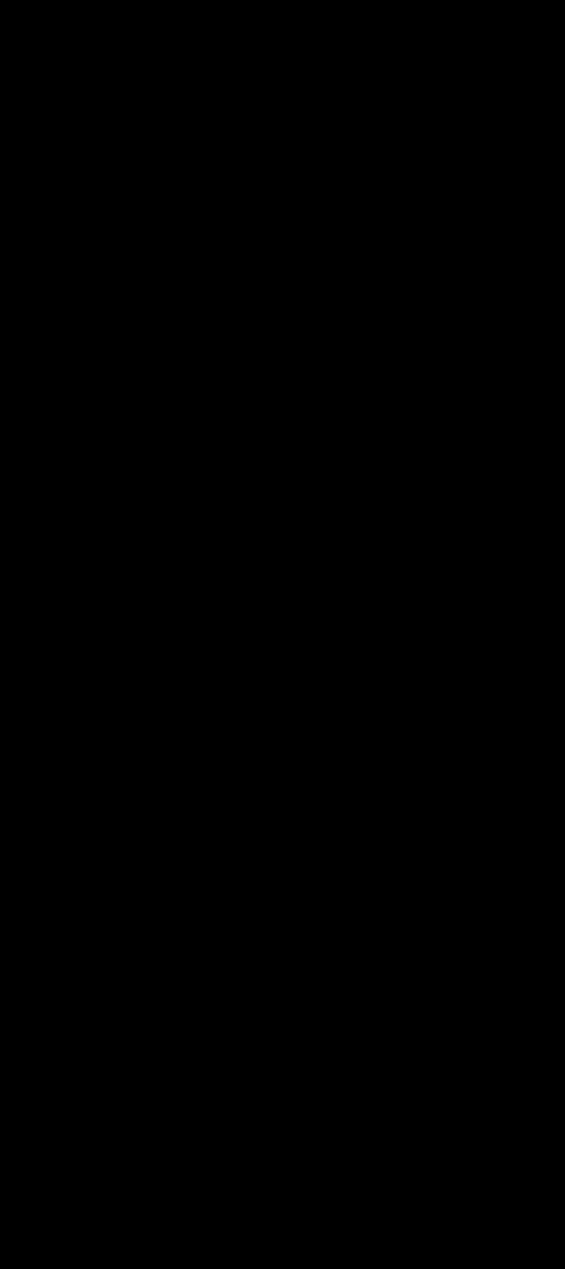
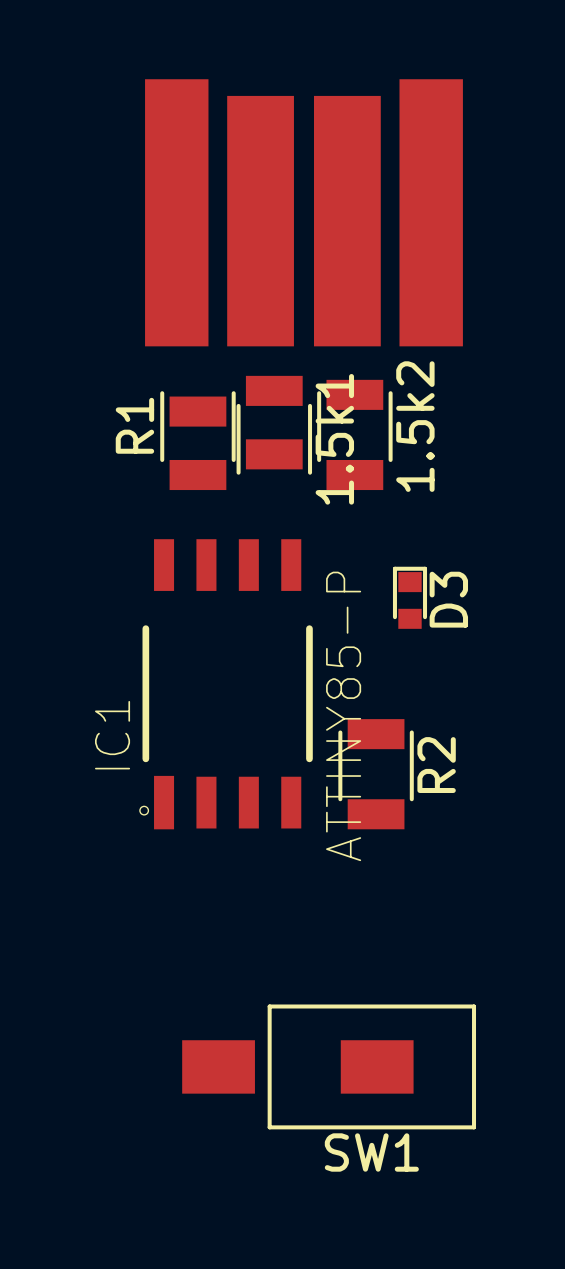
part: none -> (303, 212)
1.5k1: none -> (274, 425)
1.5k2: none -> (354, 434)
R1: none -> (197, 440)
D3: none -> (410, 597)
IC1: none -> ATTINY85-P (226, 684)
R2: none -> (376, 774)
SW1: none -> (329, 1066)

